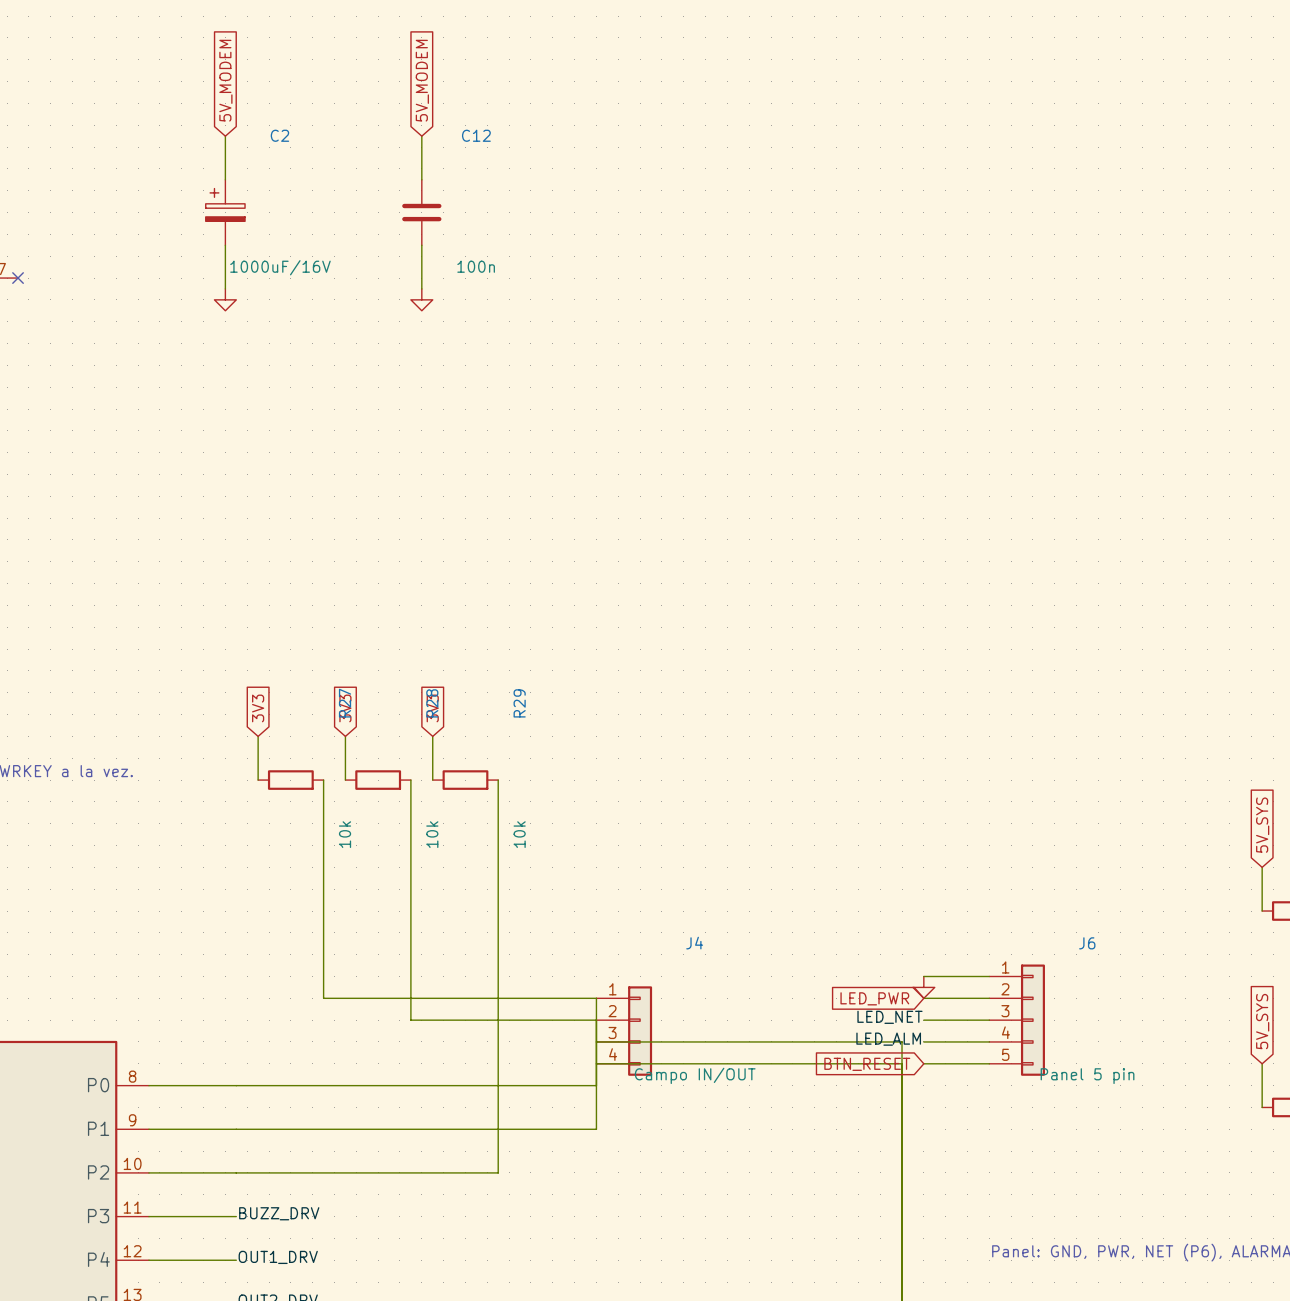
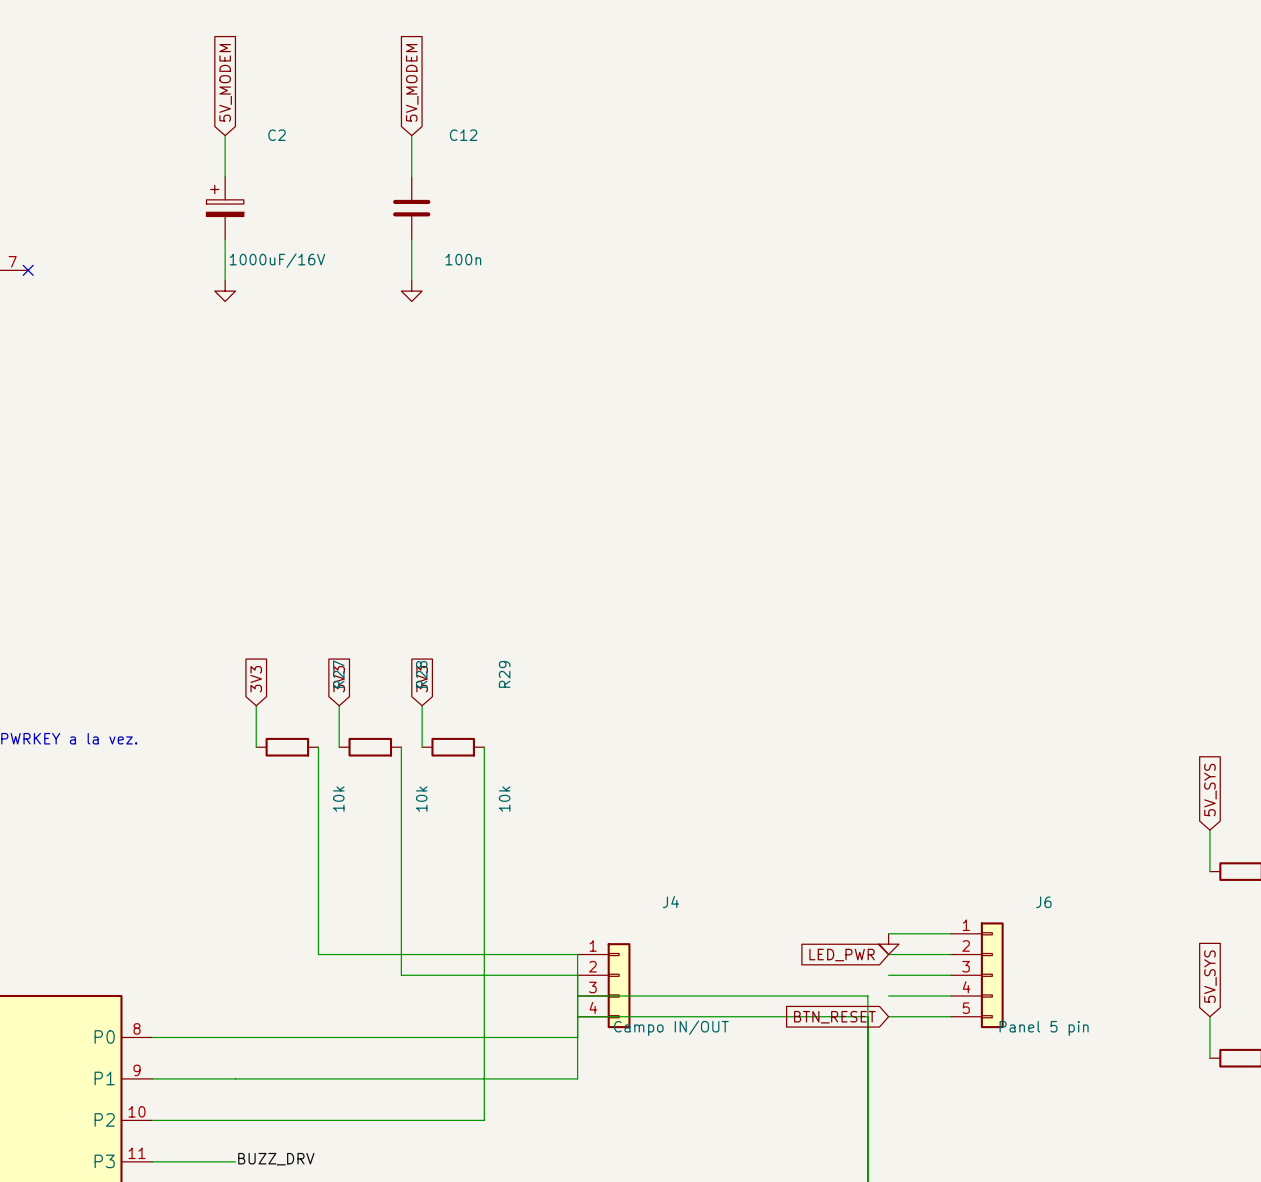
label: LED_NET (889, 1017) -> none
label: LED_ALM (888, 1039) -> none

